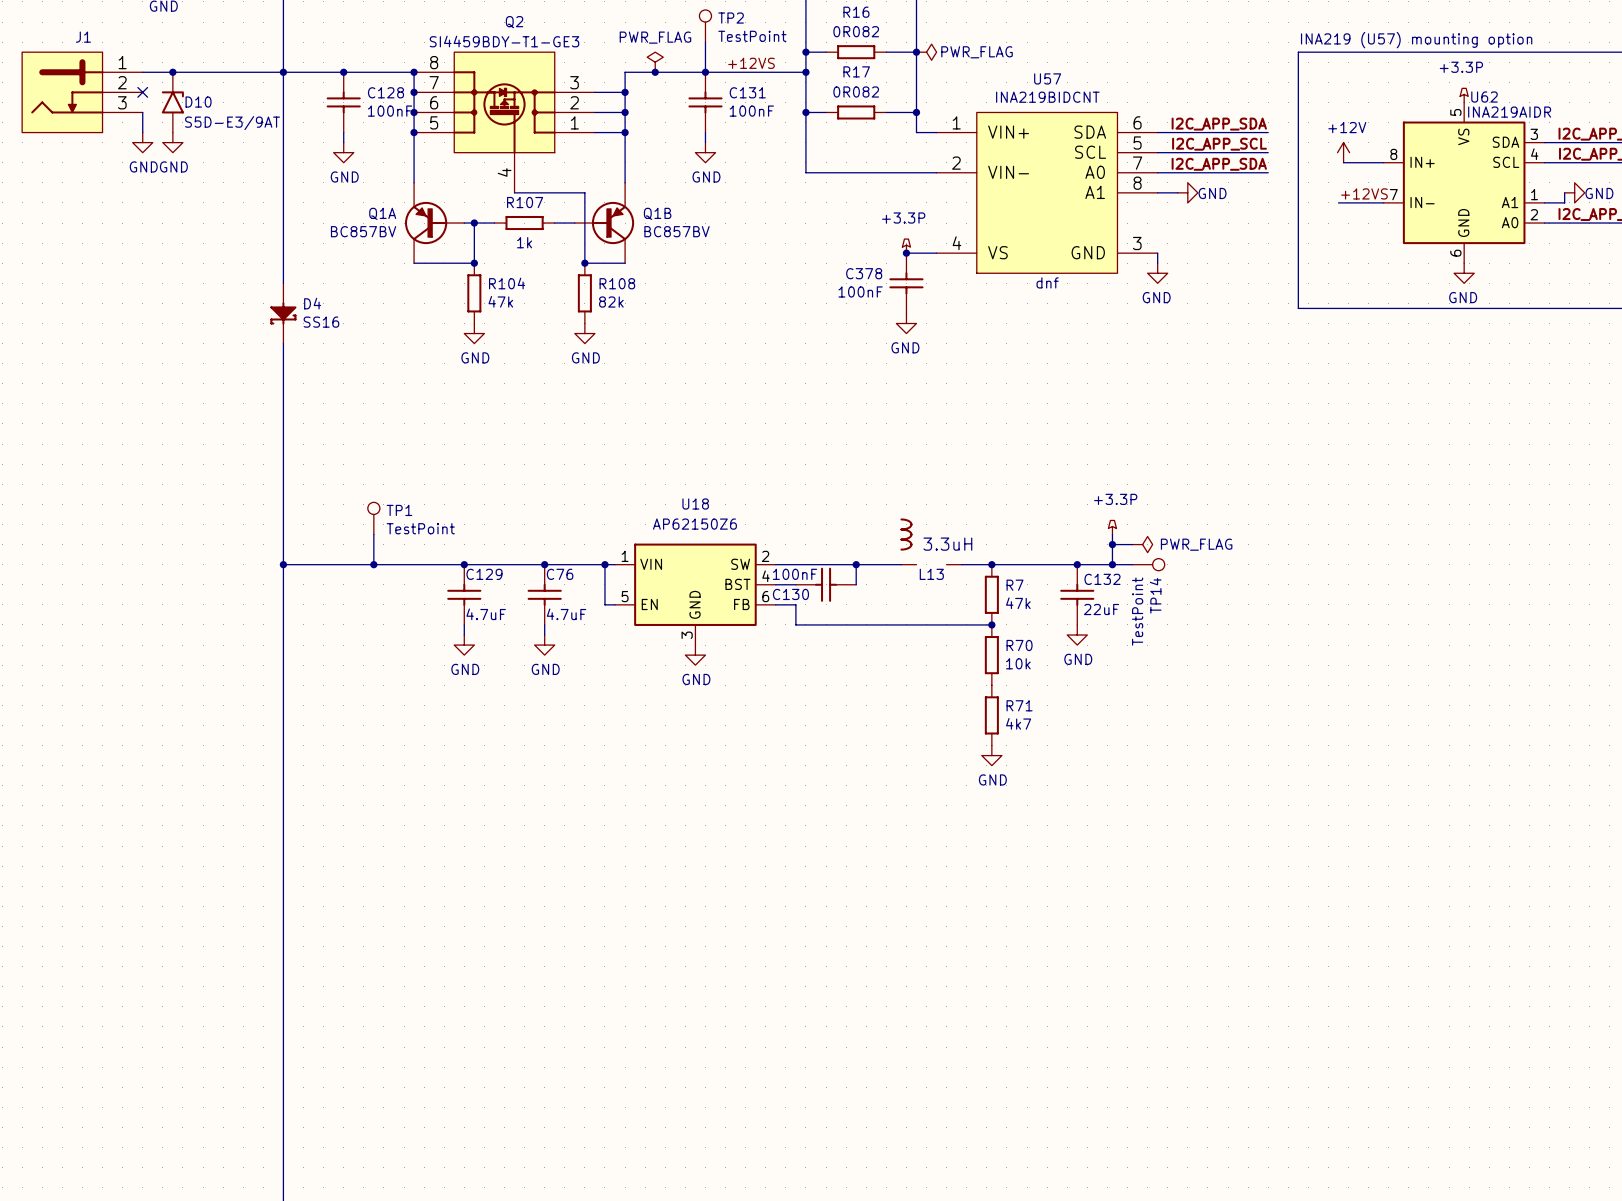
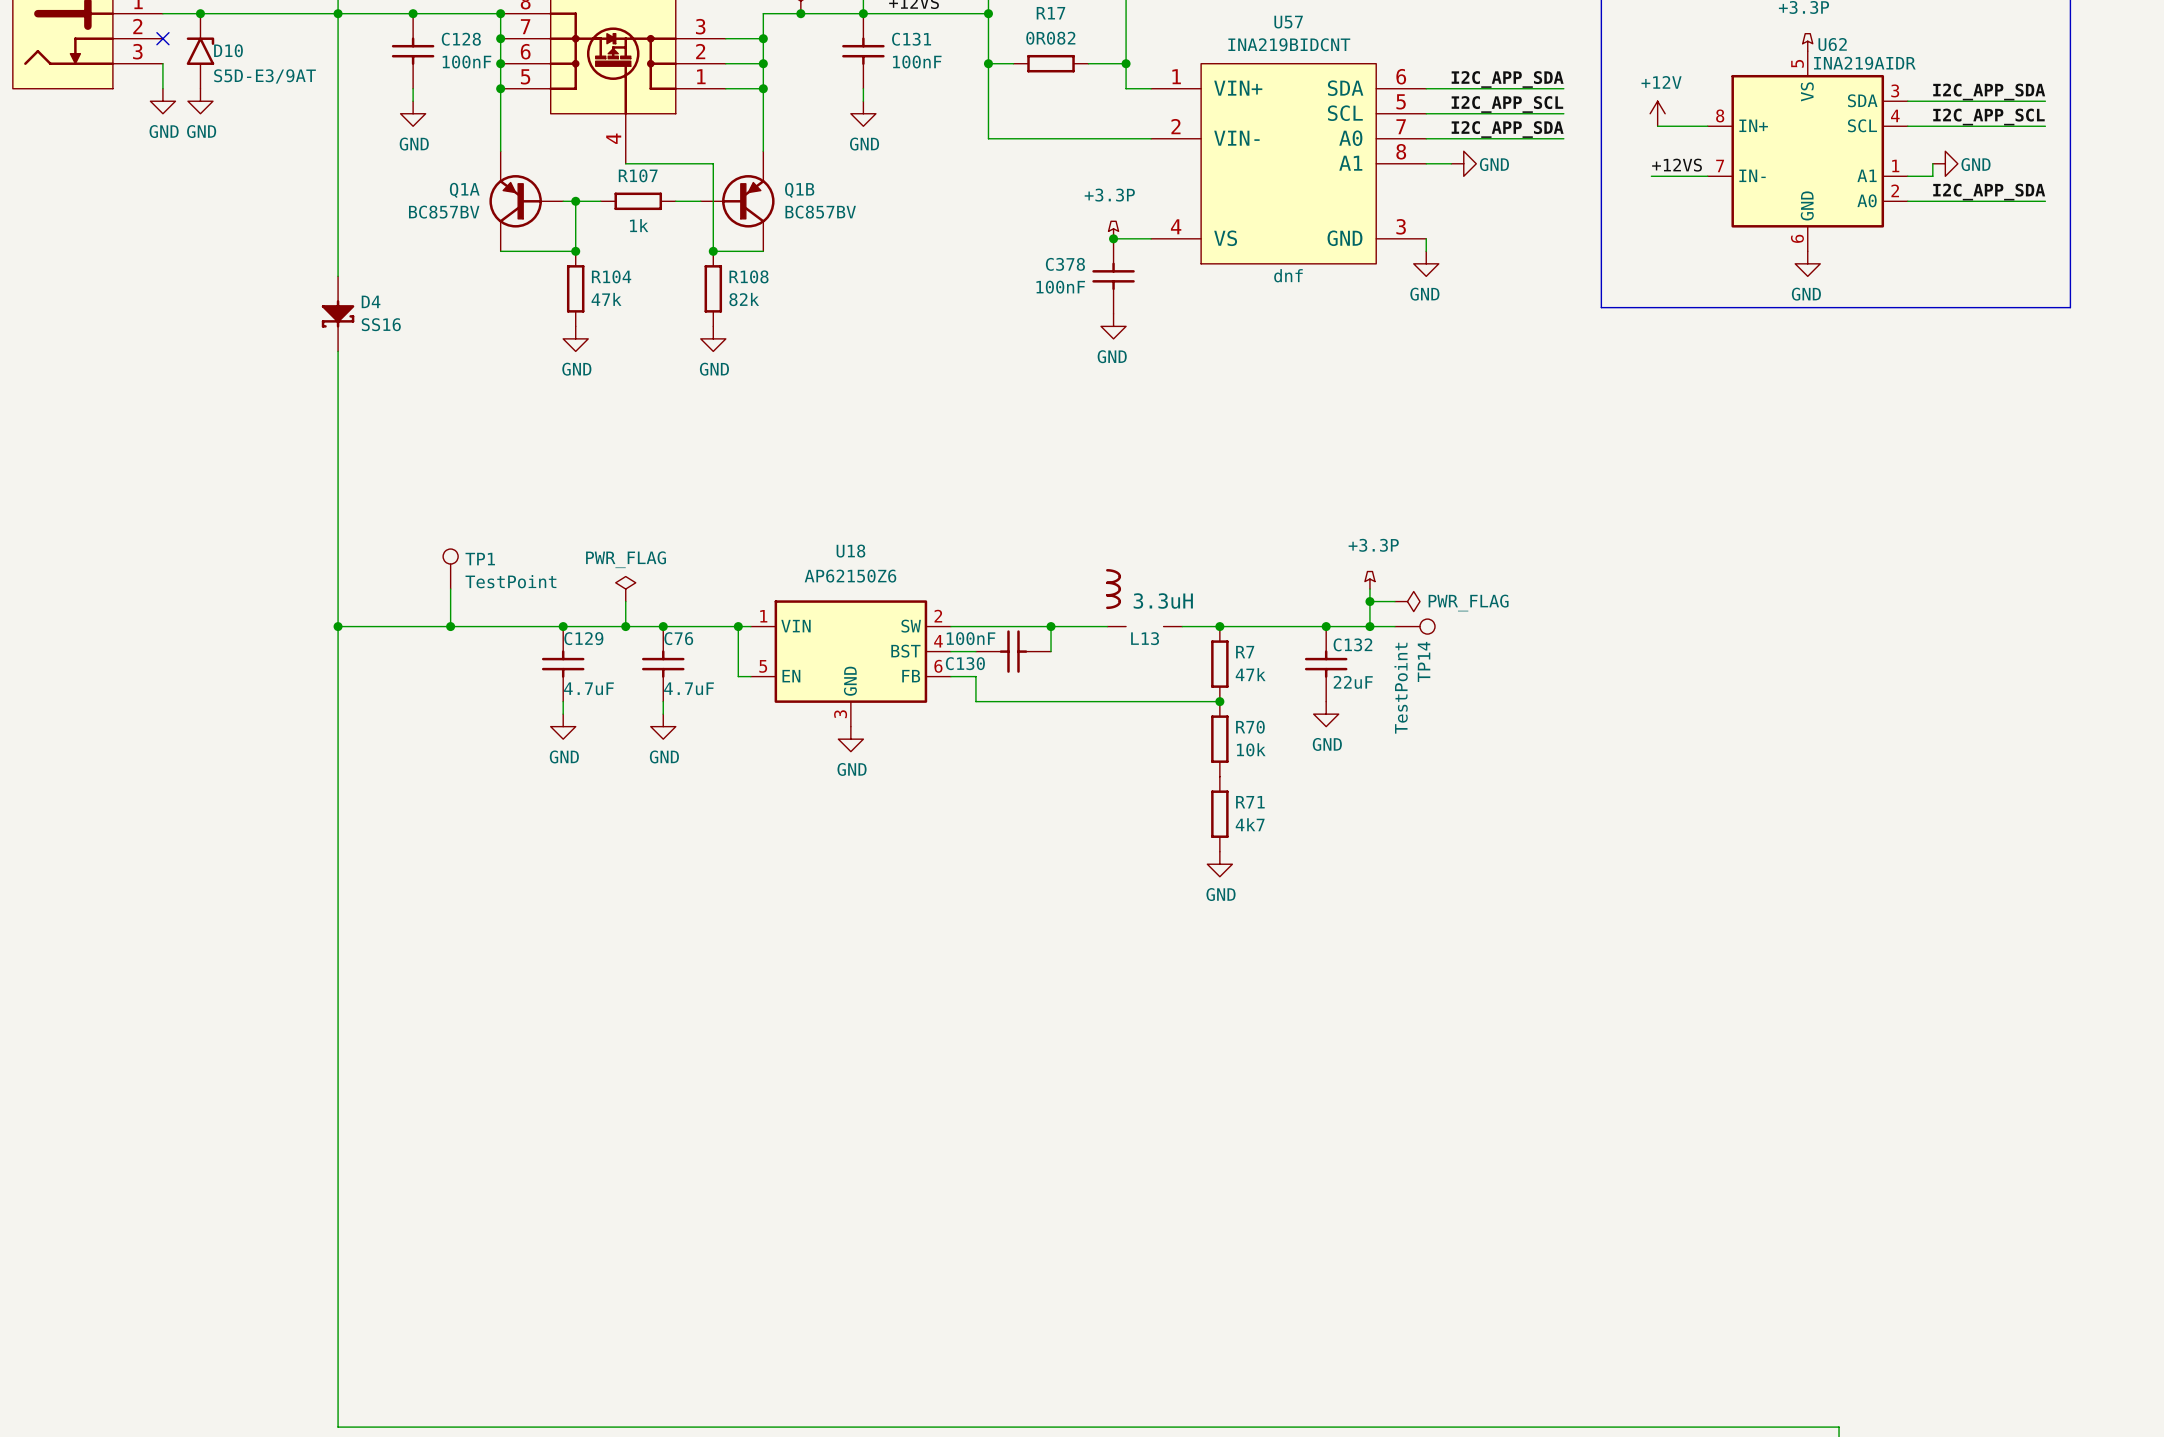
power symbol: none -> PWR_FLAG (625, 589)
wire: none -> (625, 601) (625, 626)
junction: none -> (625, 626)

